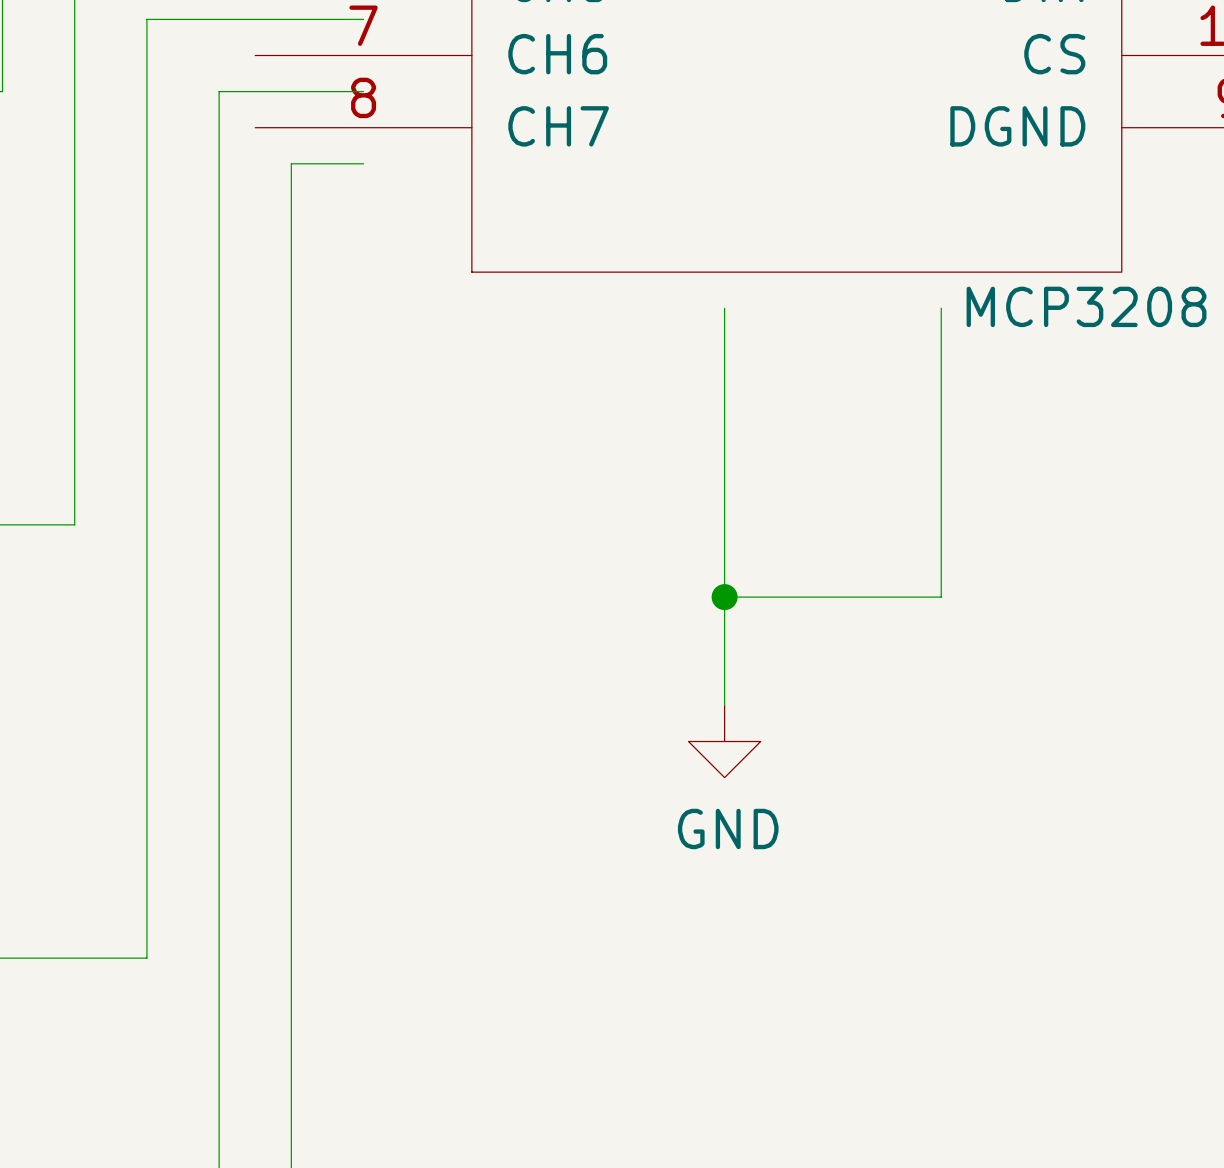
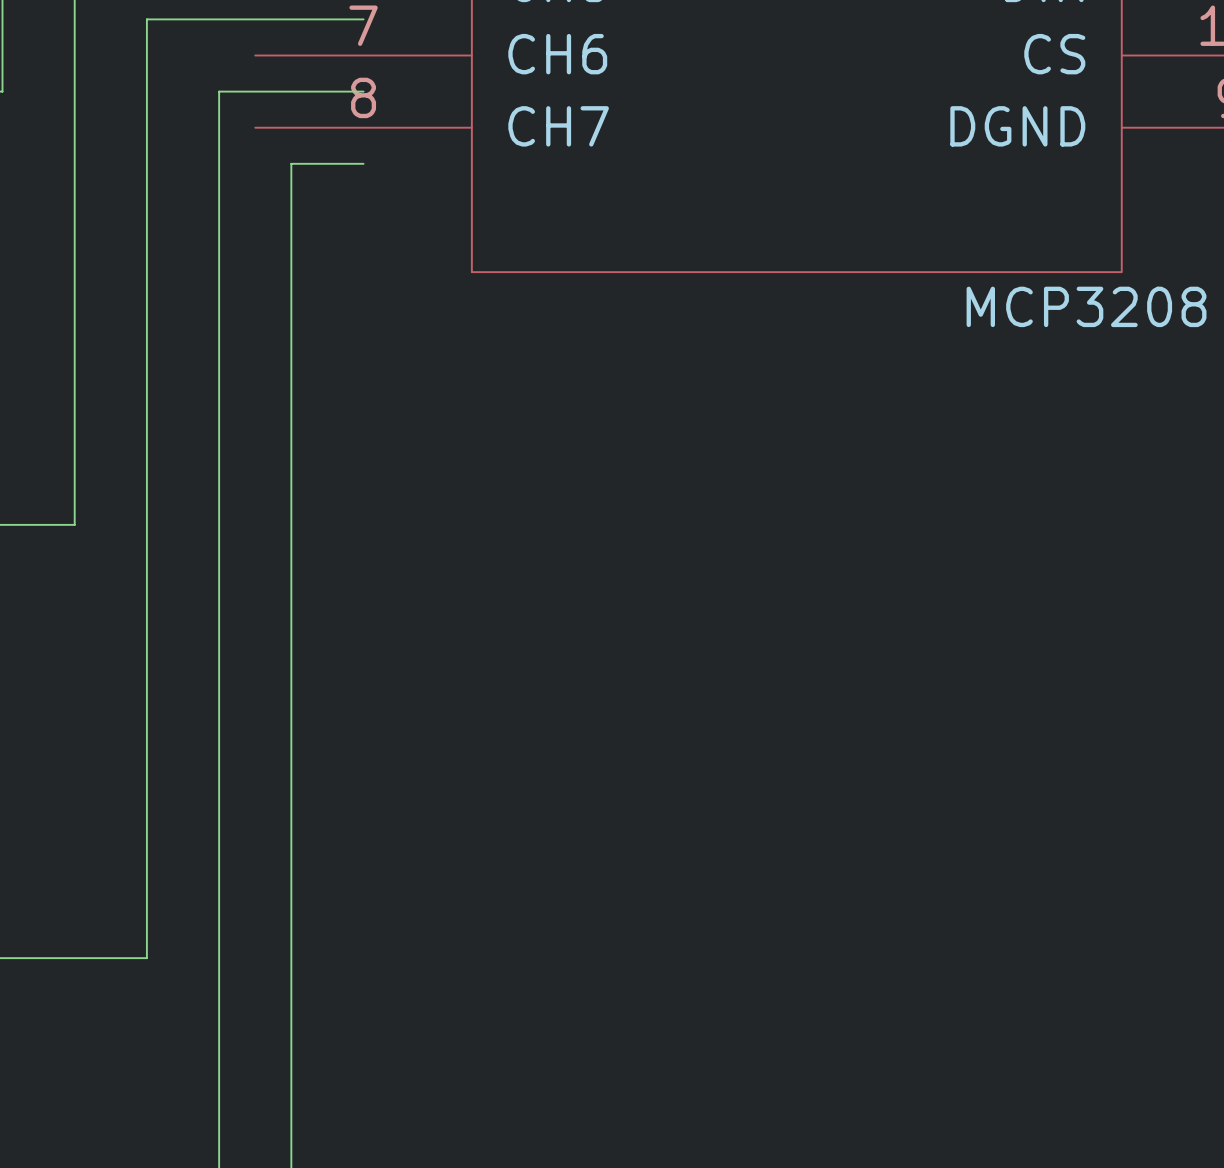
wire: (724, 308) (724, 705) -> none
wire: (941, 308) (941, 597) (724, 597) -> none
junction: (724, 597) -> none
power symbol: GND (724, 741) -> none

